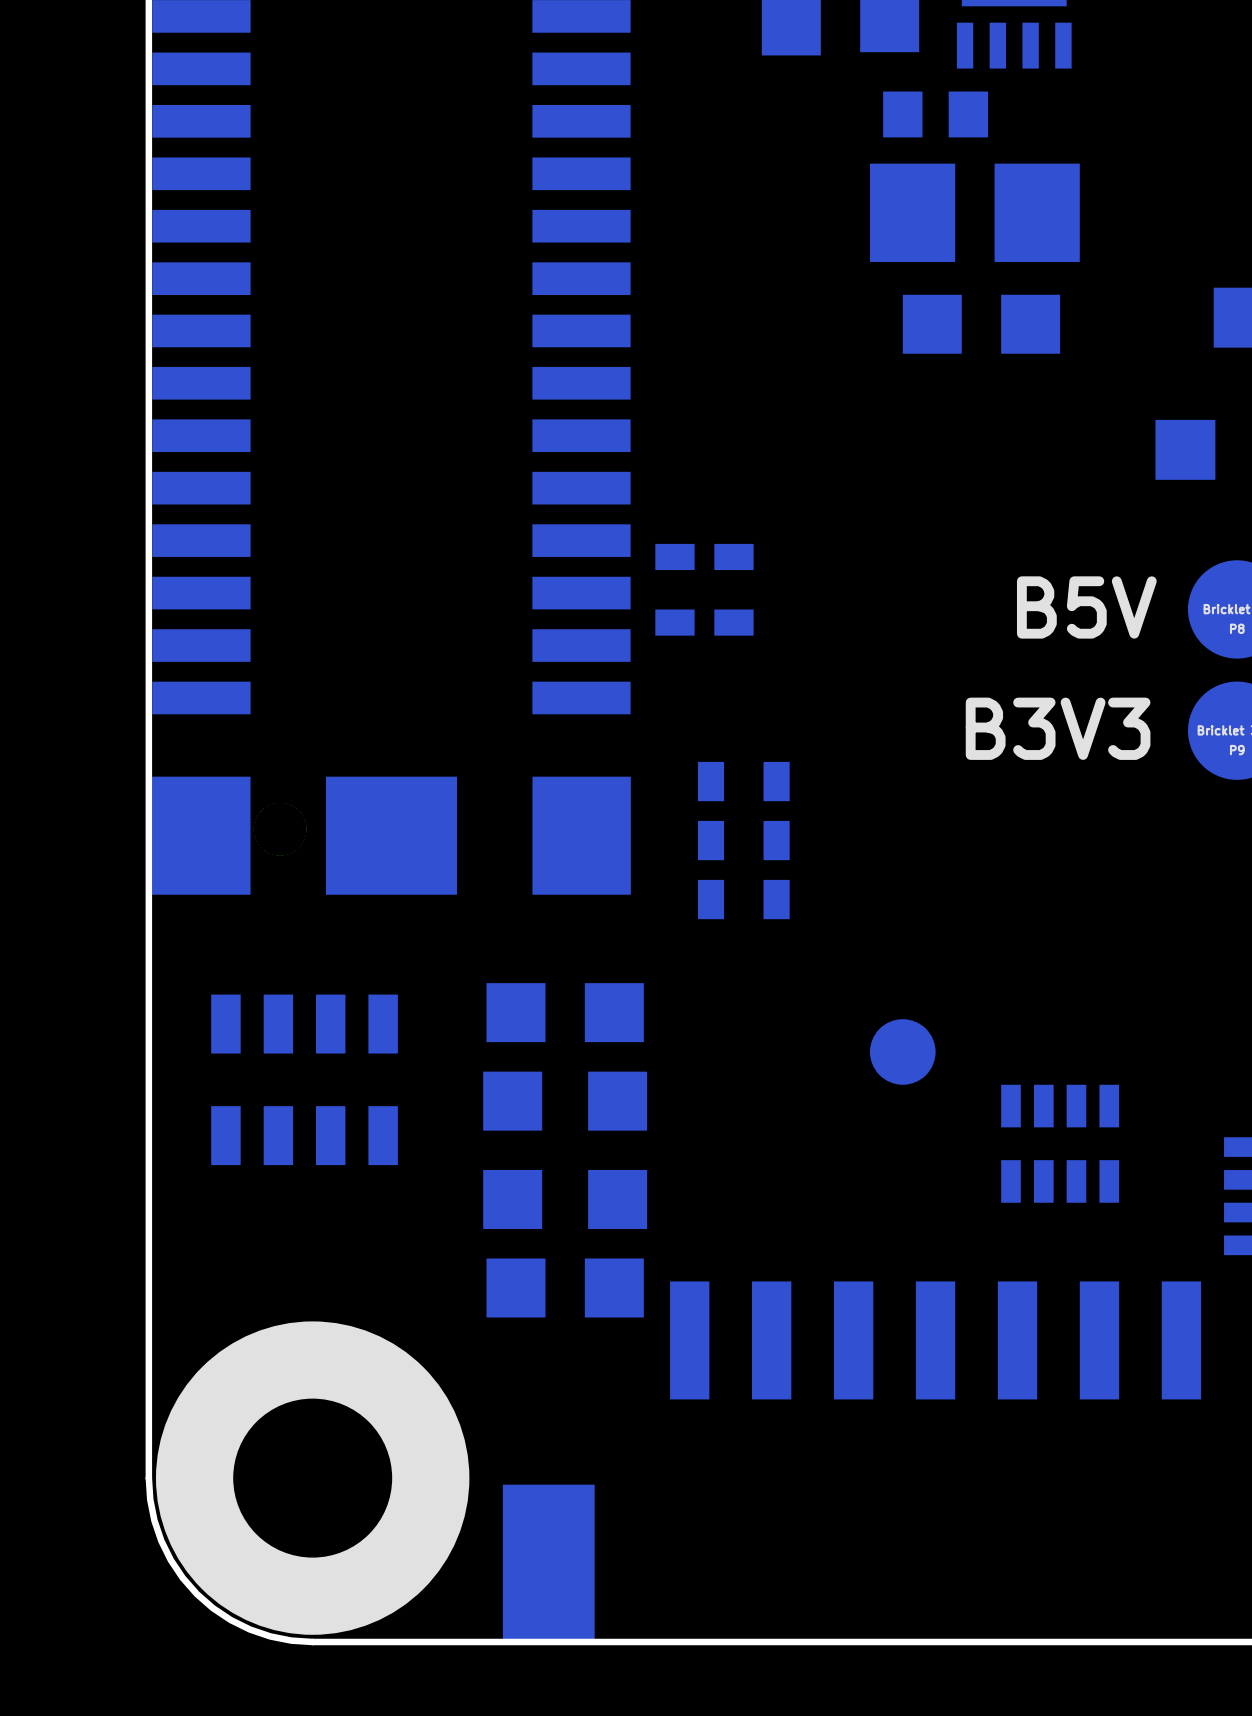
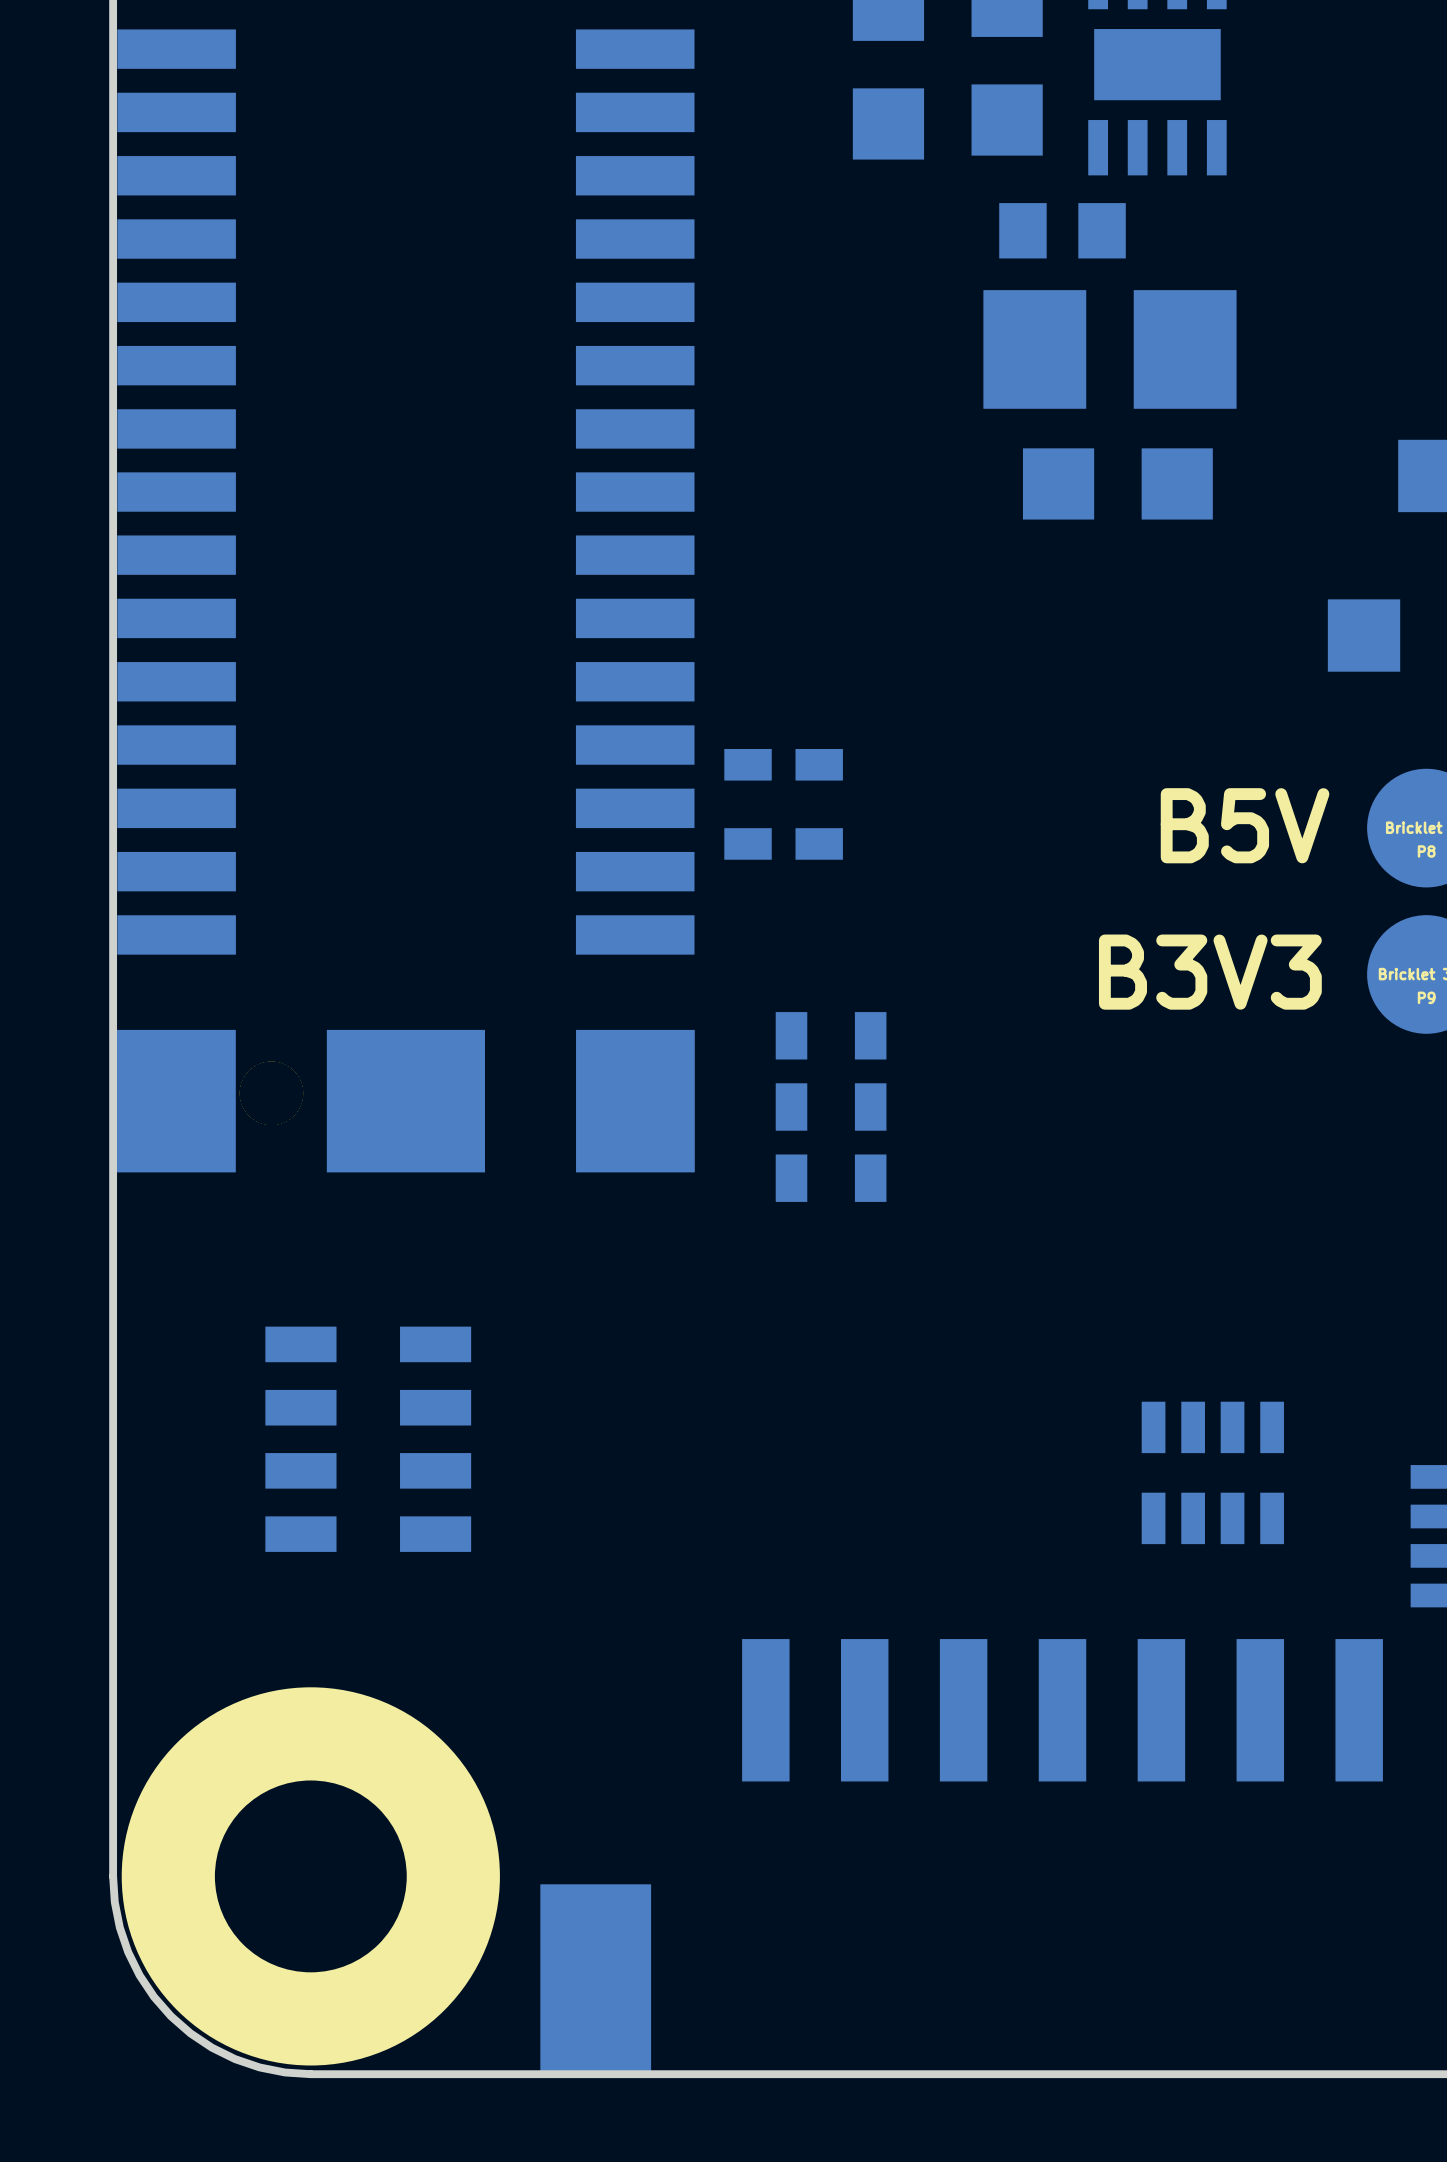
part: (565, 1012) -> none
part: (902, 1051) -> none
part rotation: 0° (304, 1079) -> 90° clockwise (368, 1439)
part: (512, 1150) -> none
part: (617, 1150) -> none
part: (565, 1287) -> none

